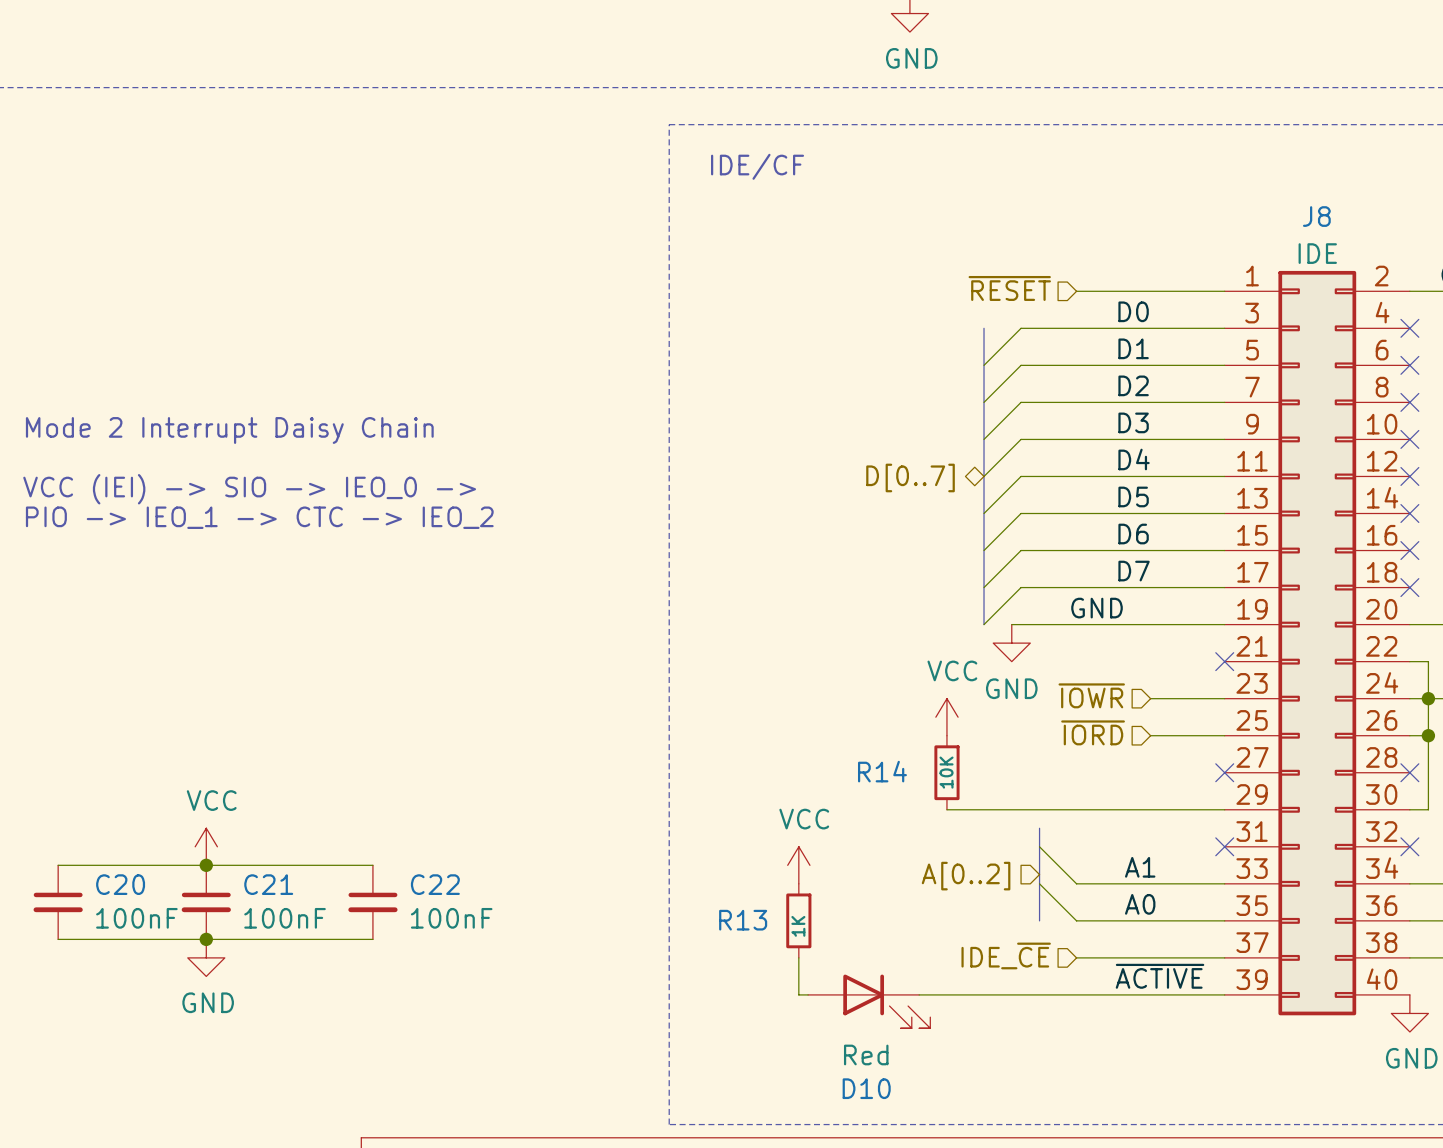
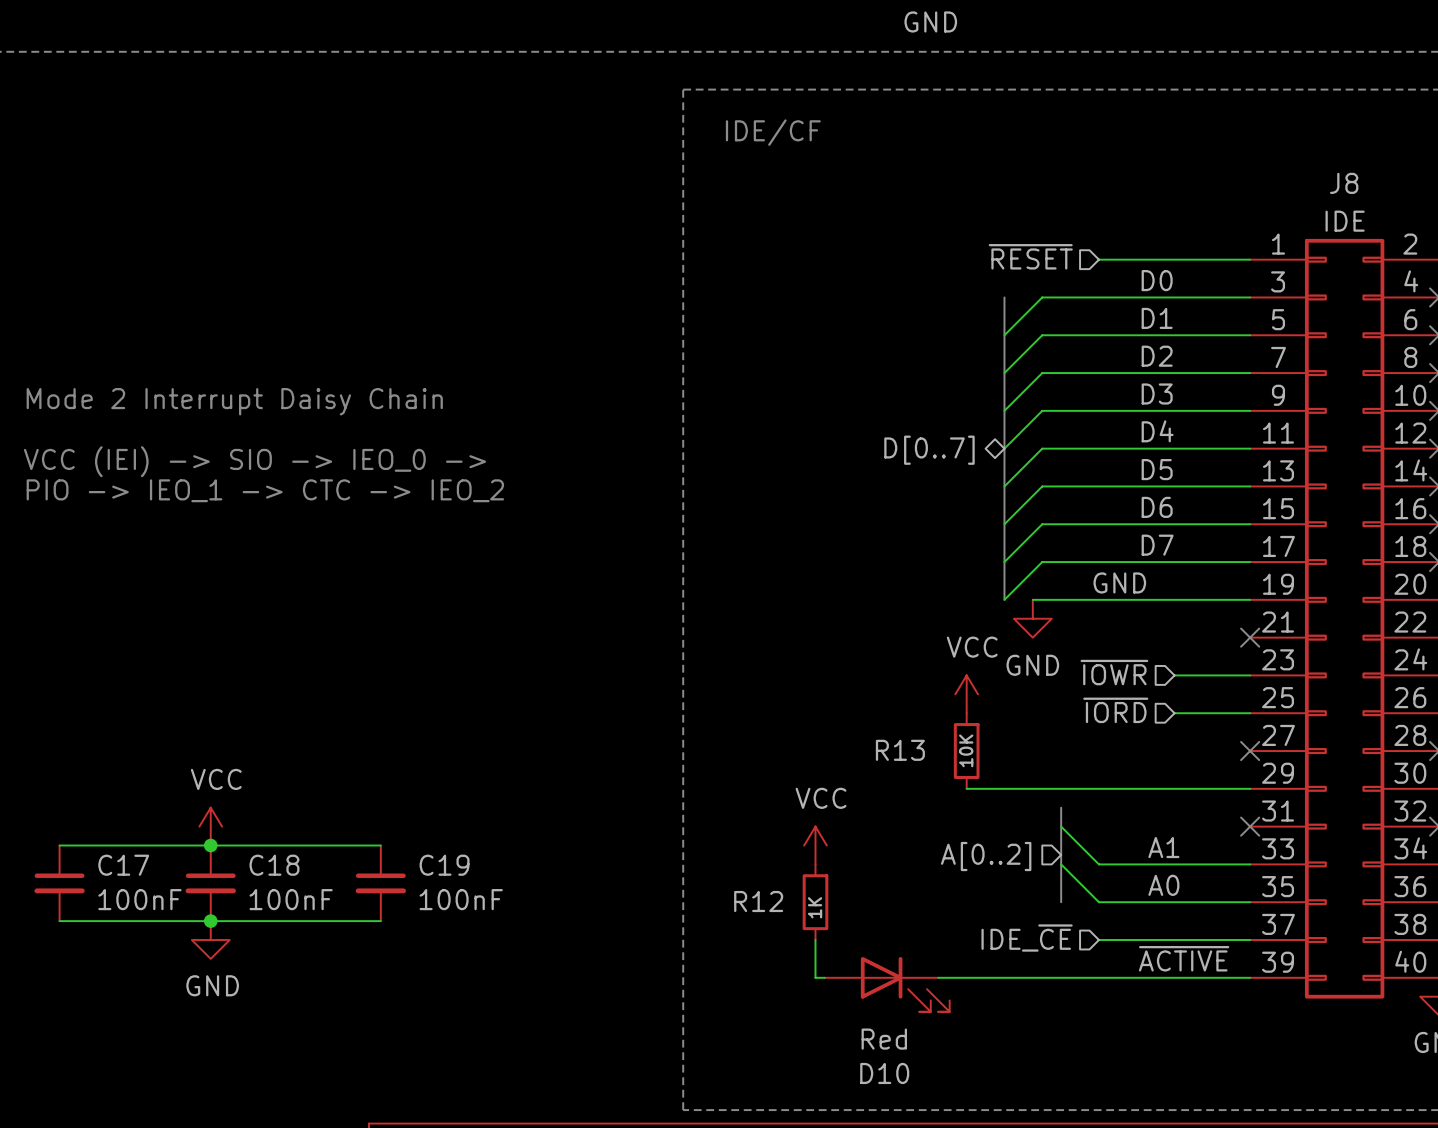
R14 name: R14 (882, 771) -> R13 (900, 750)
C20 name: C20 (120, 884) -> C17 (123, 865)
C21 name: C21 (268, 884) -> C18 (274, 865)
C22 name: C22 (435, 884) -> C19 (444, 865)
R13 name: R13 (743, 920) -> R12 (758, 901)

